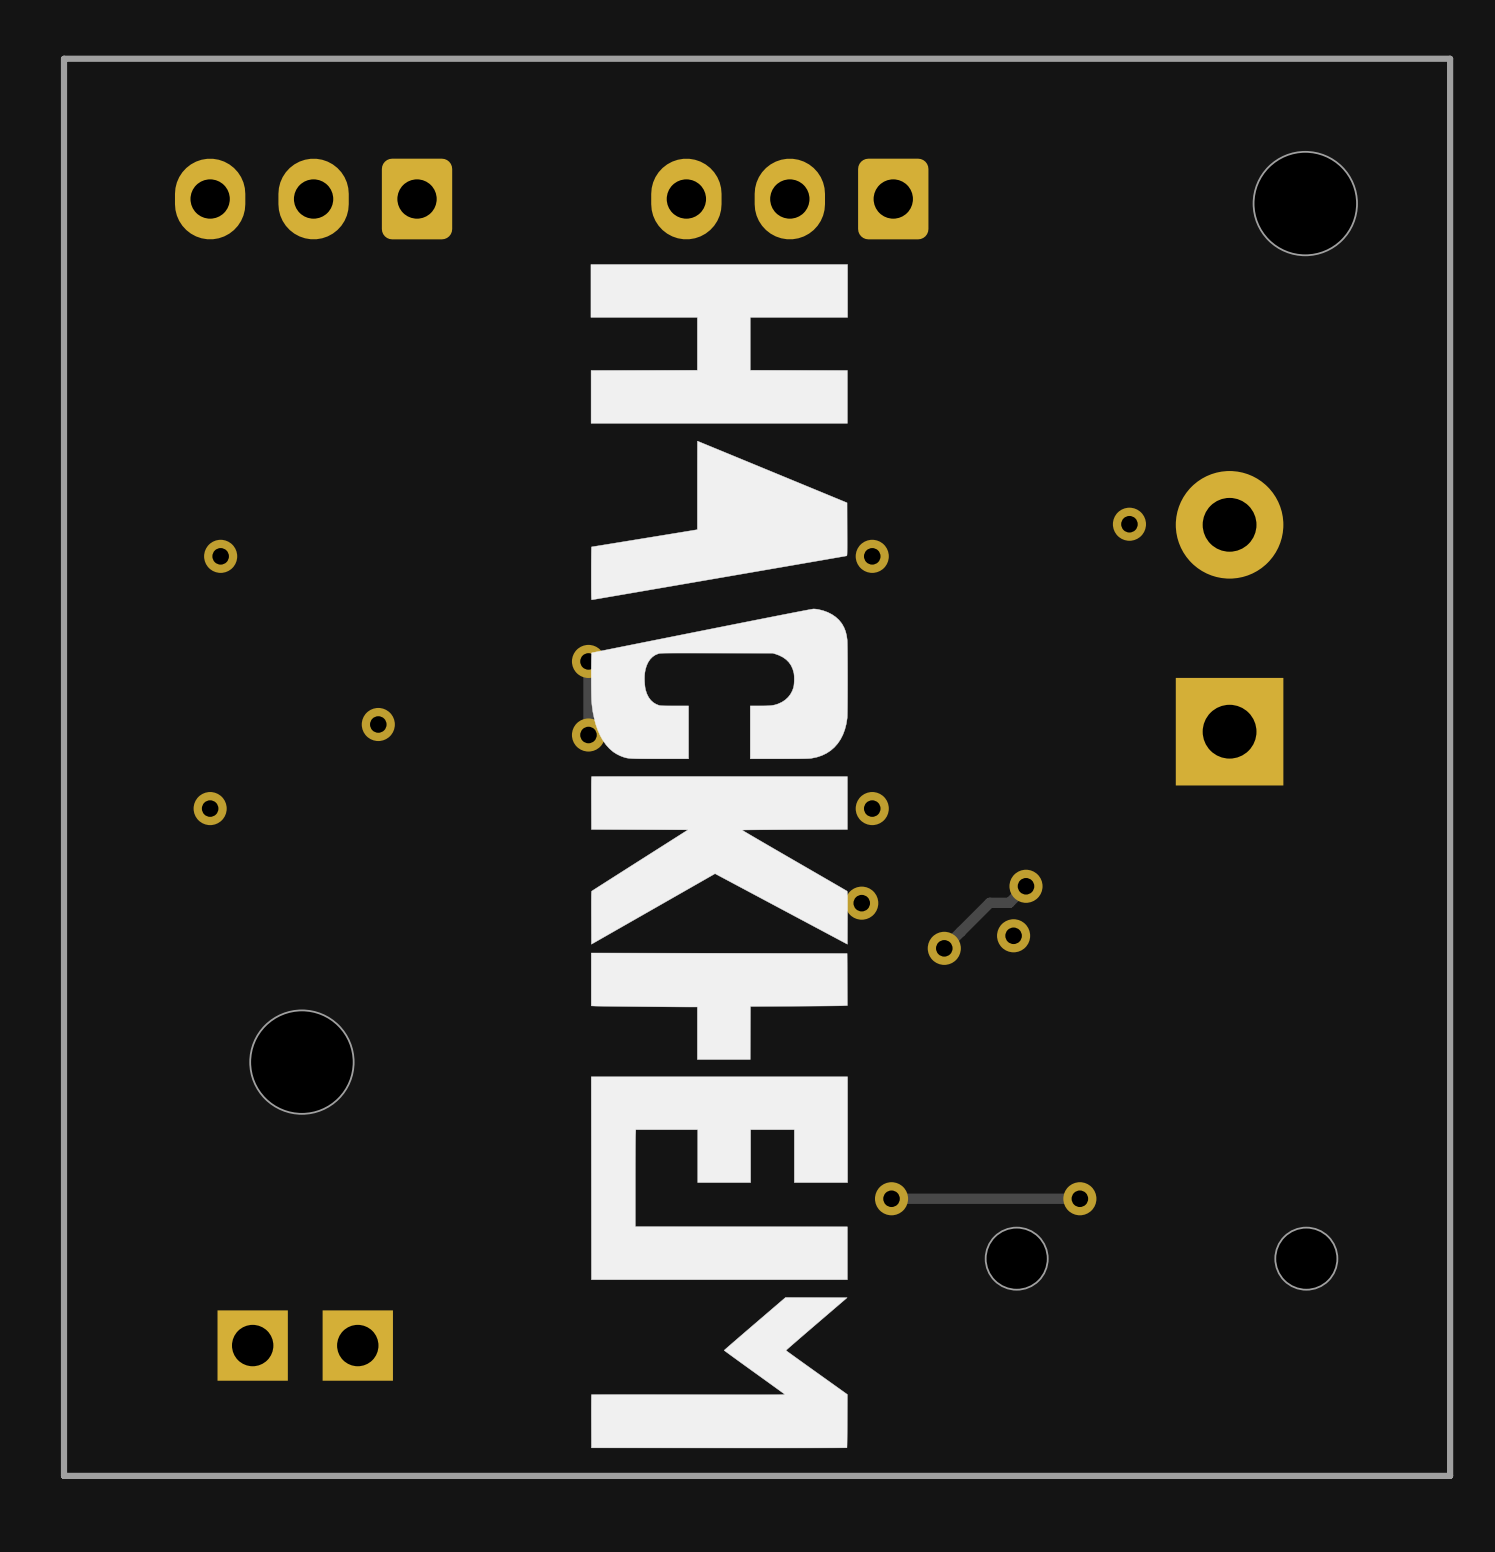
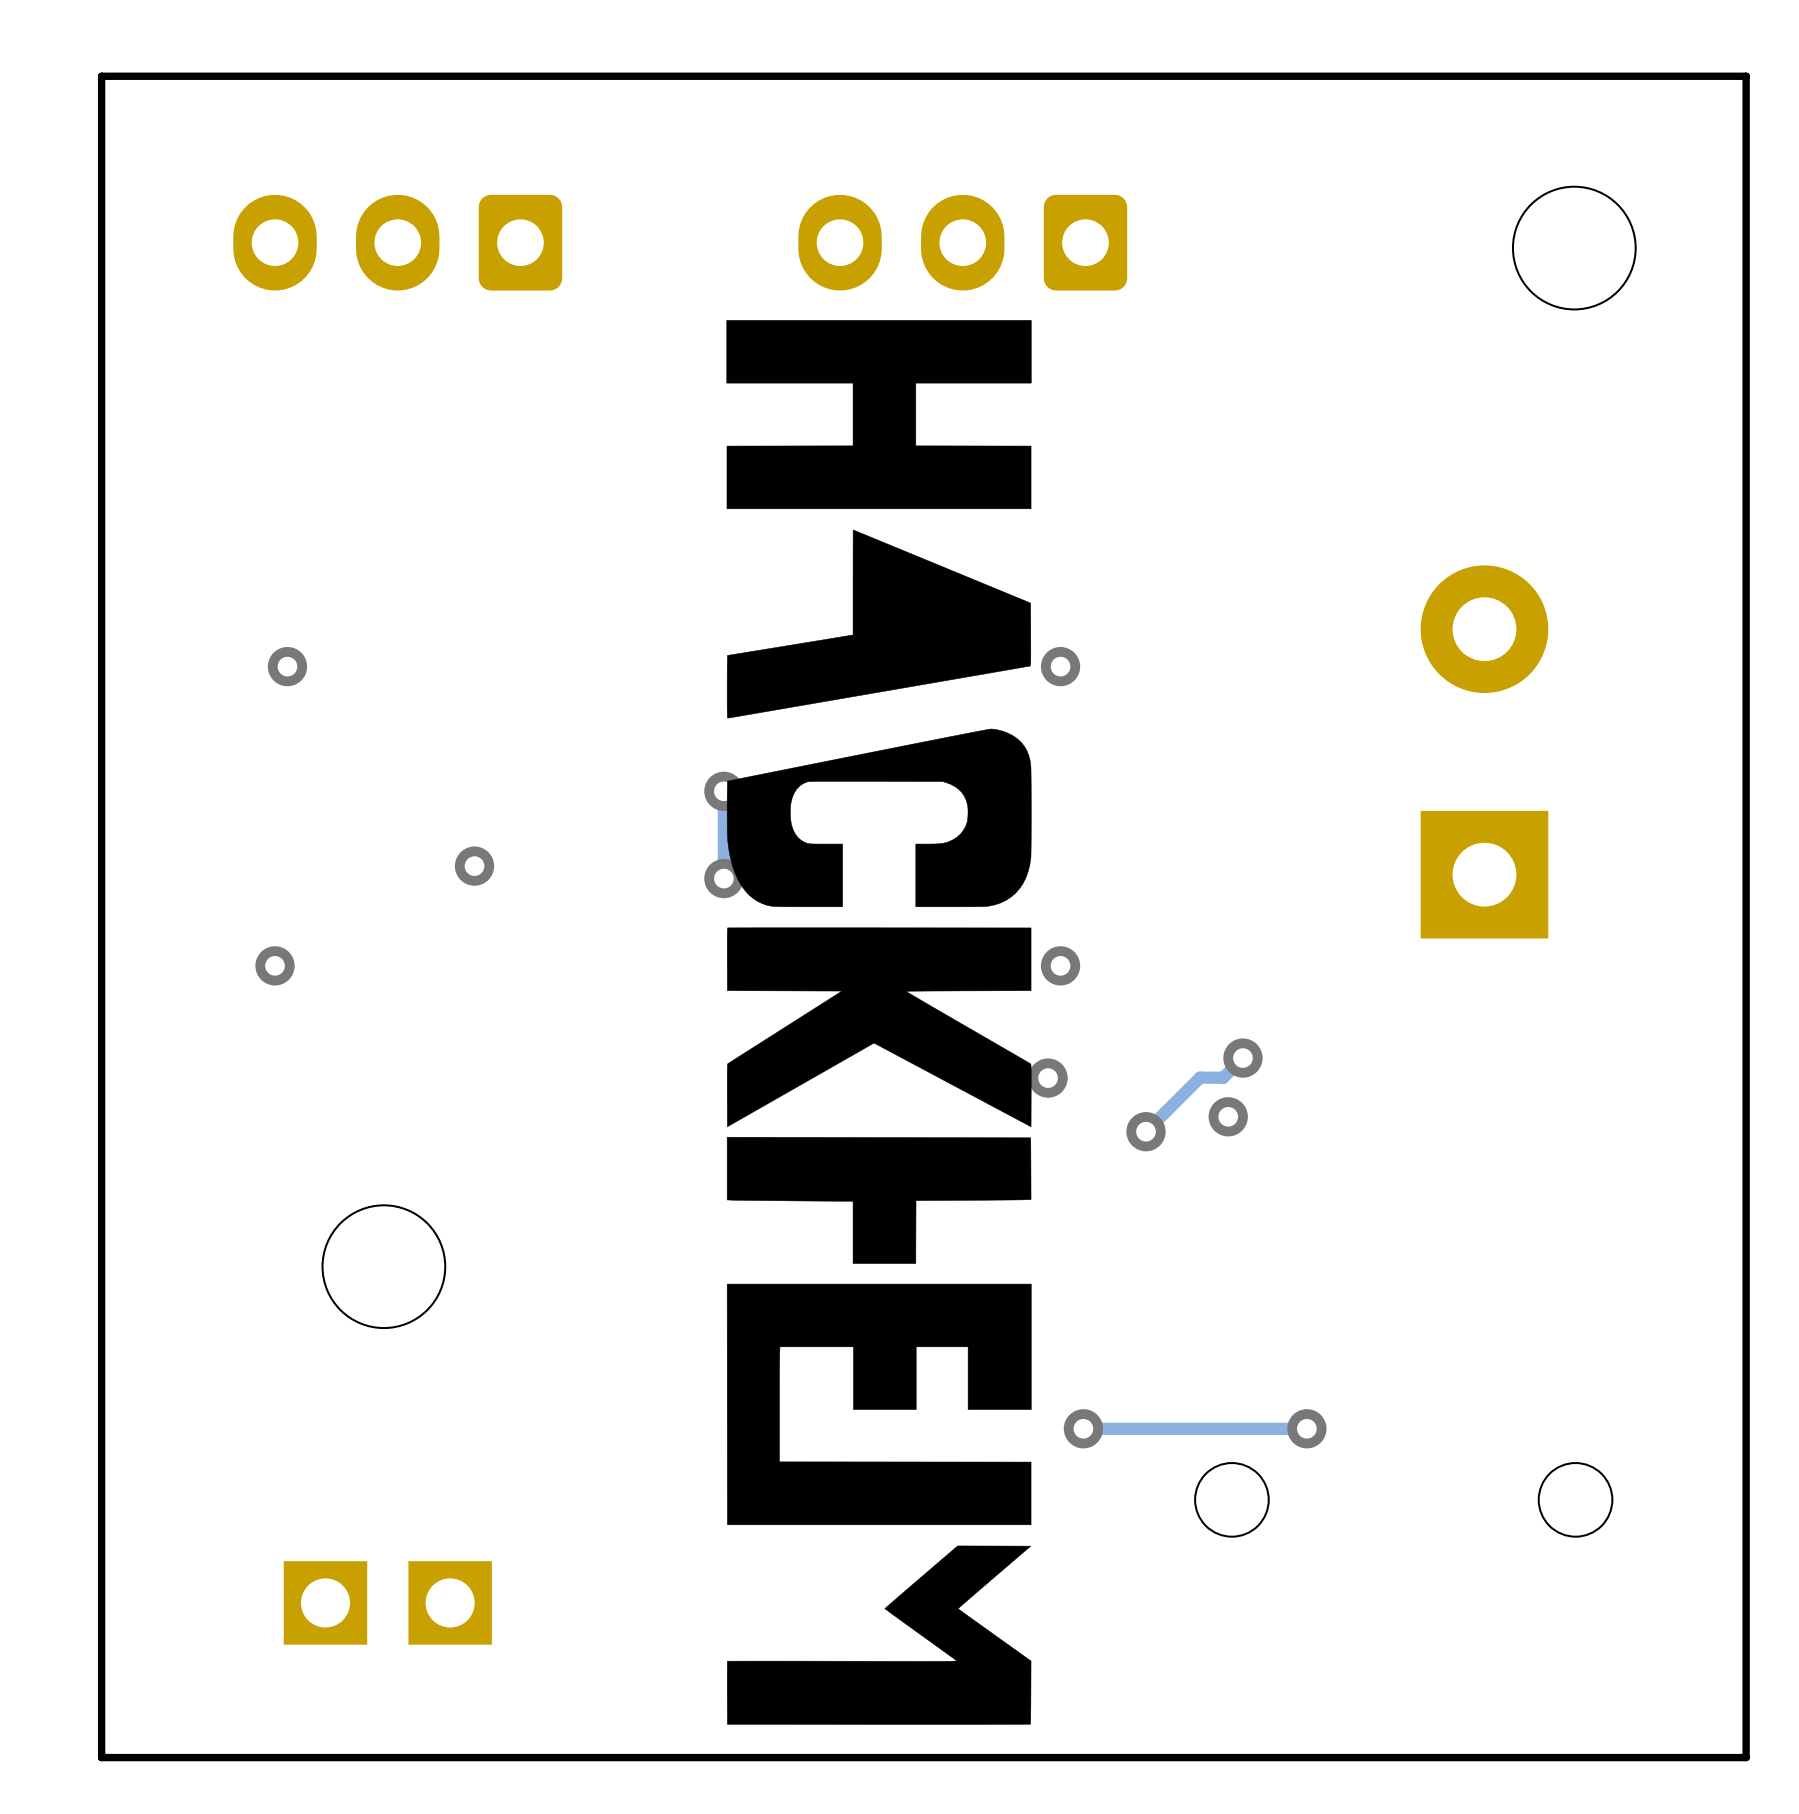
via: (1129, 524) -> none

